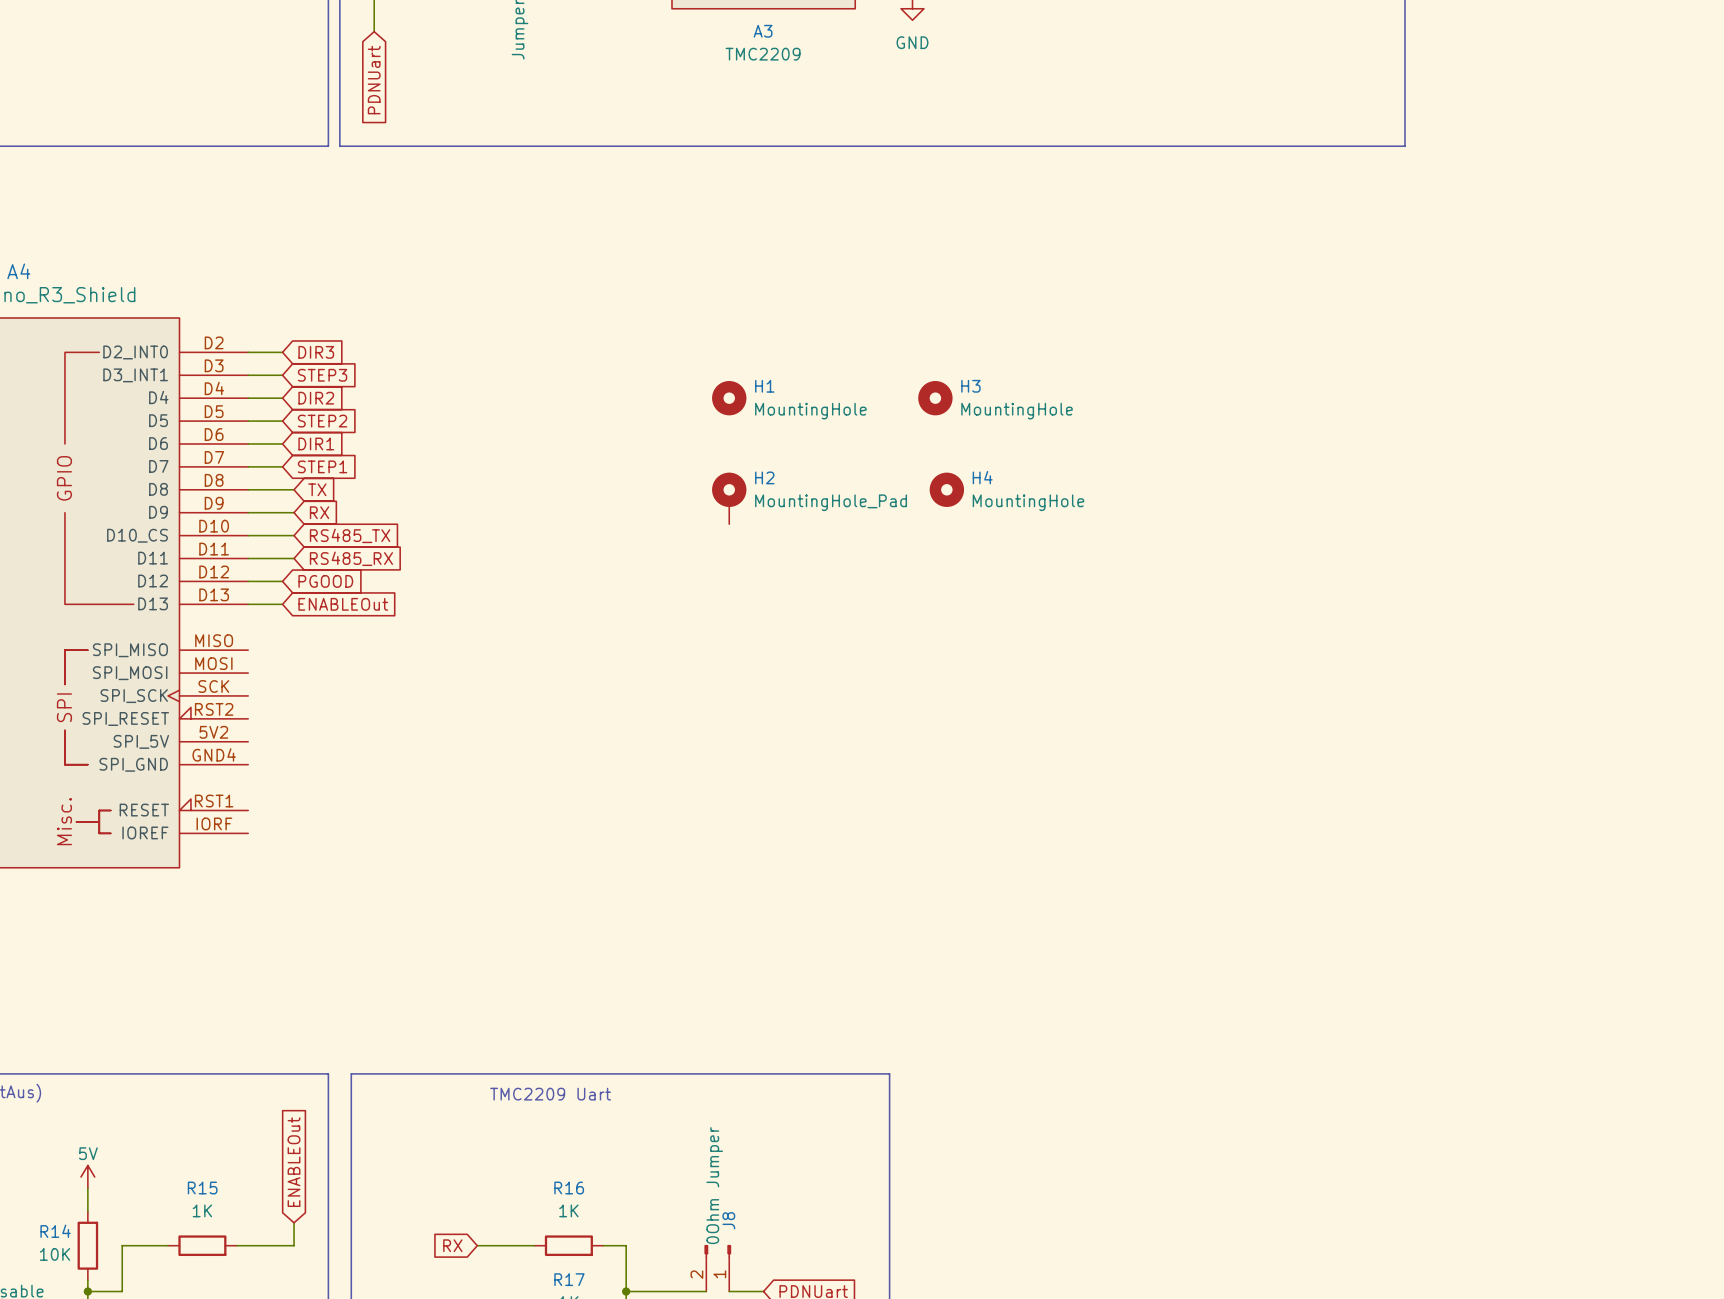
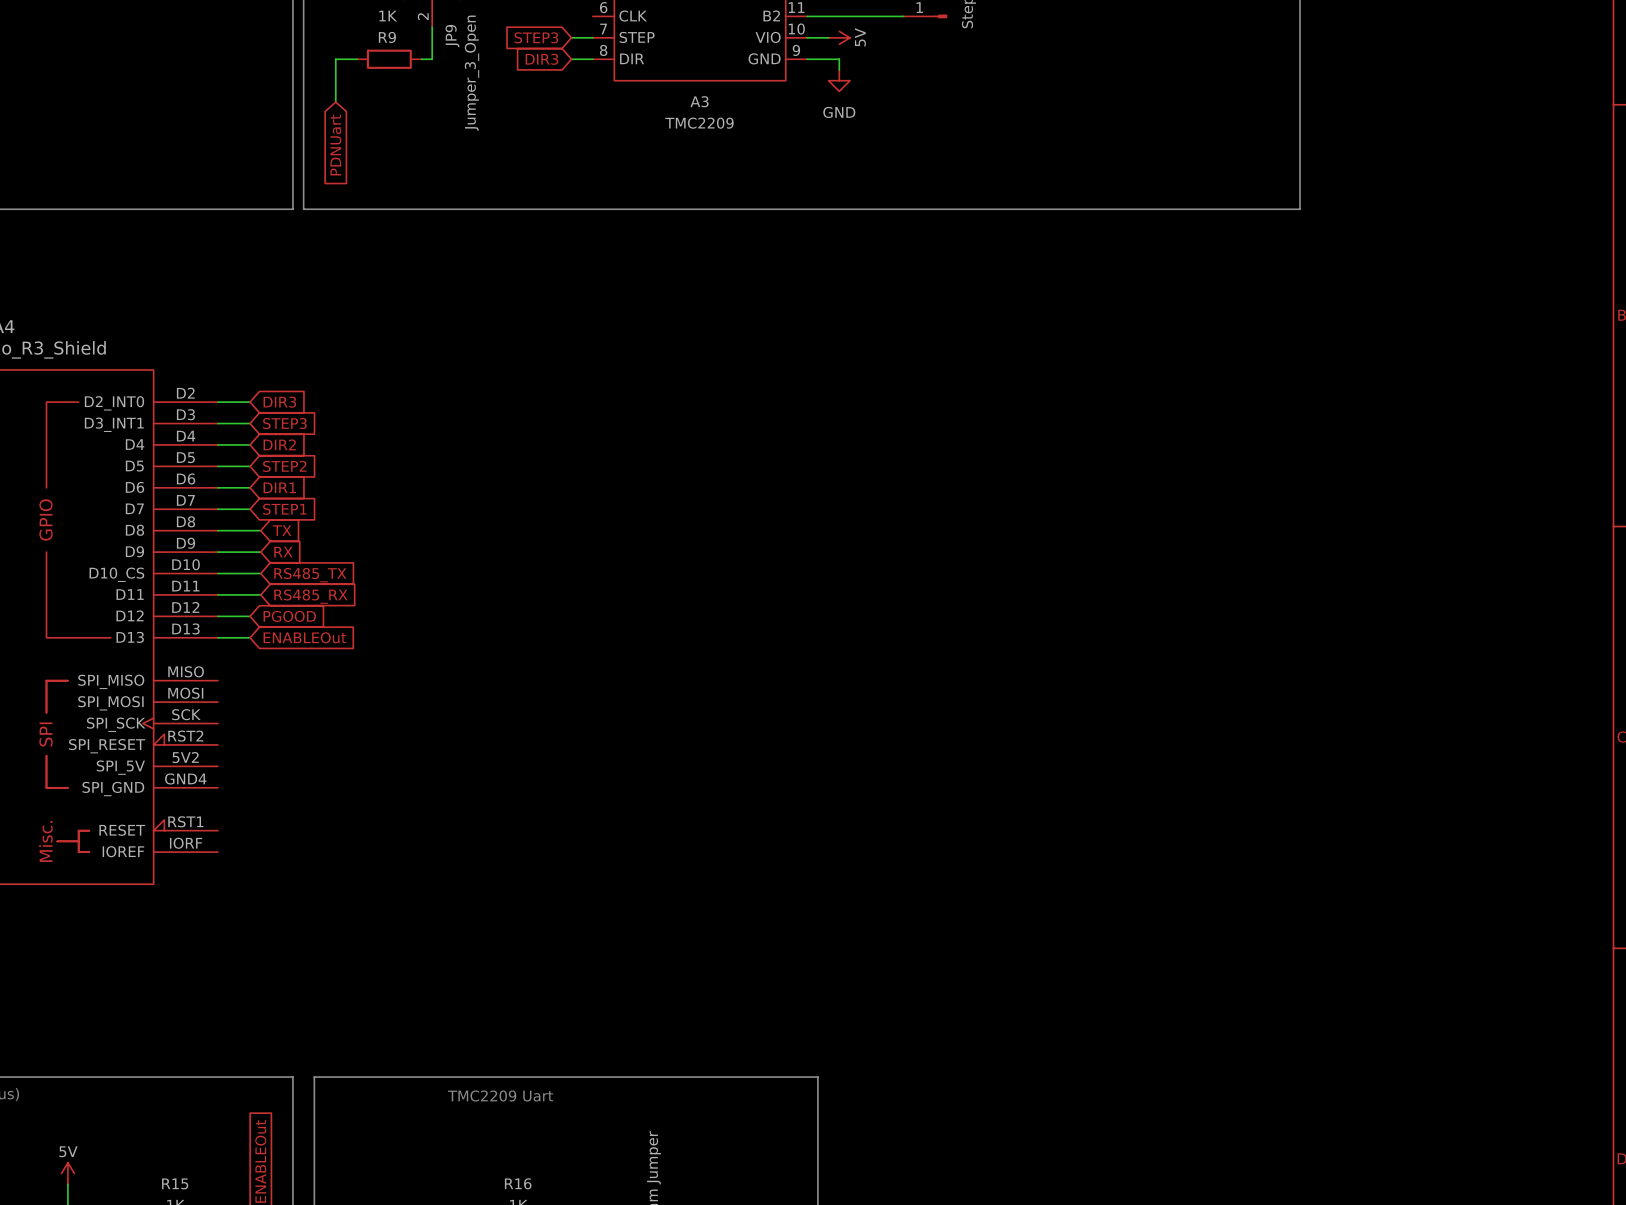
H1: MountingHole (729, 398) -> none
H3: MountingHole (935, 398) -> none
H4: MountingHole (946, 489) -> none
H2: MountingHole_Pad (729, 498) -> none

